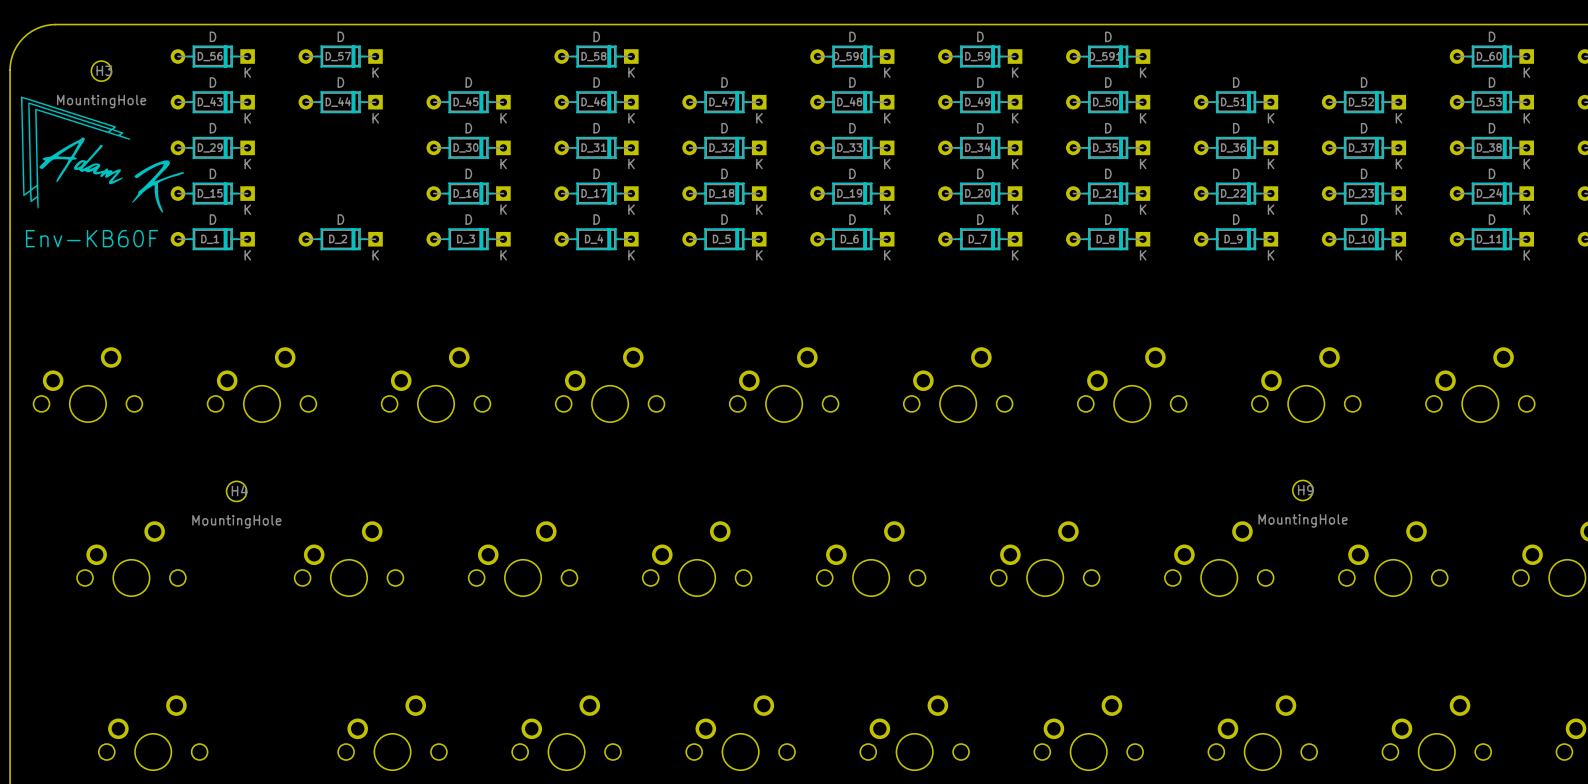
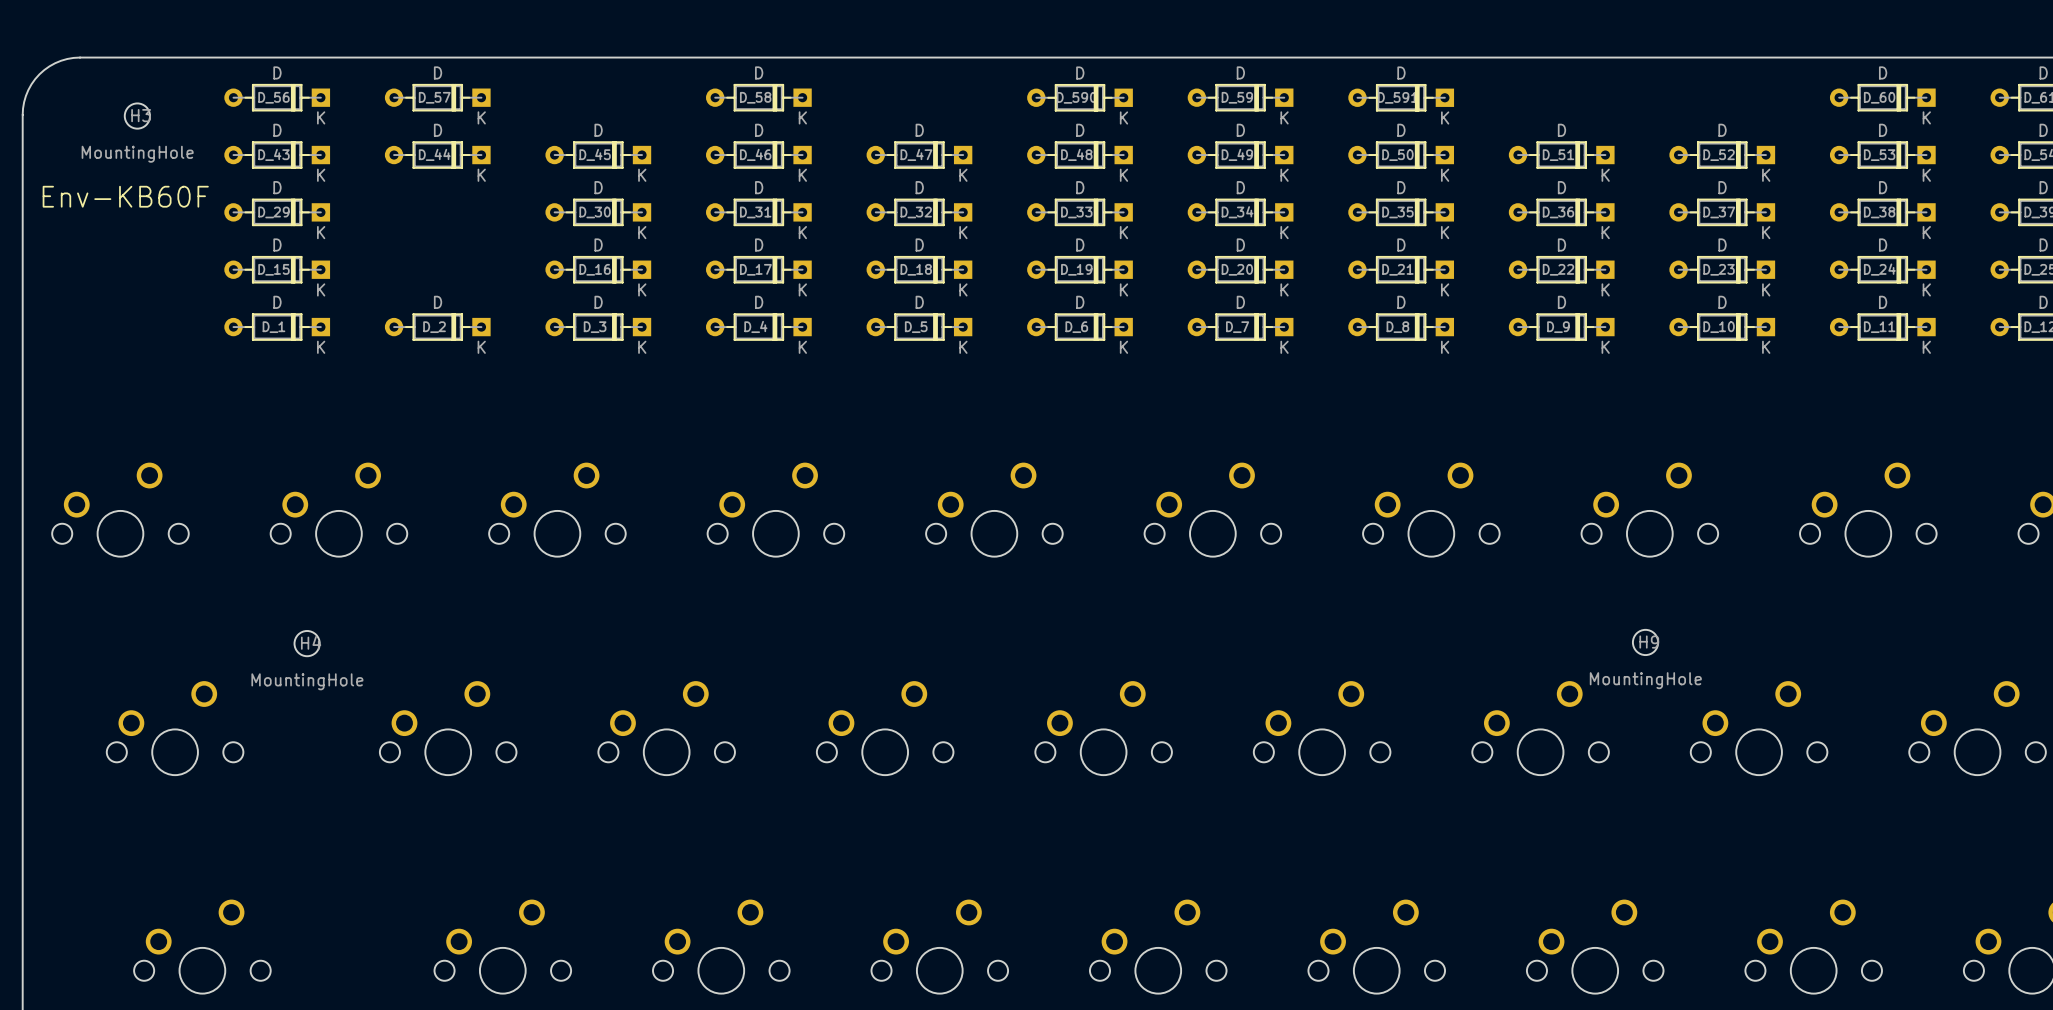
drawing: [20, 96, 184, 213] -> none
text position: Env-KB60F (92, 238) -> Env-KB60F (125, 196)

